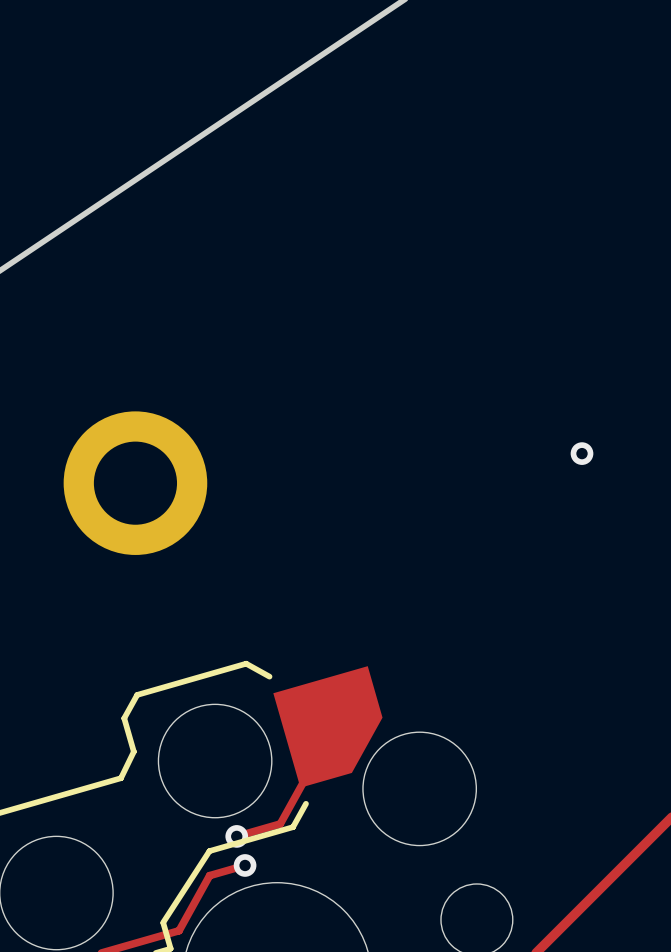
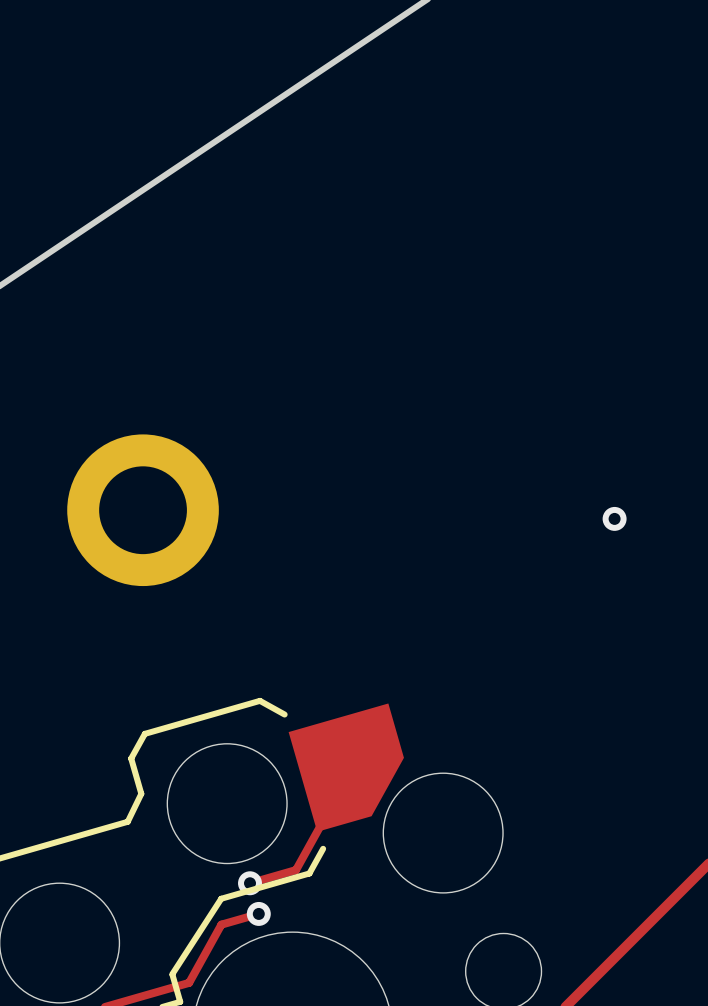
via position: (582, 453) -> (614, 518)

